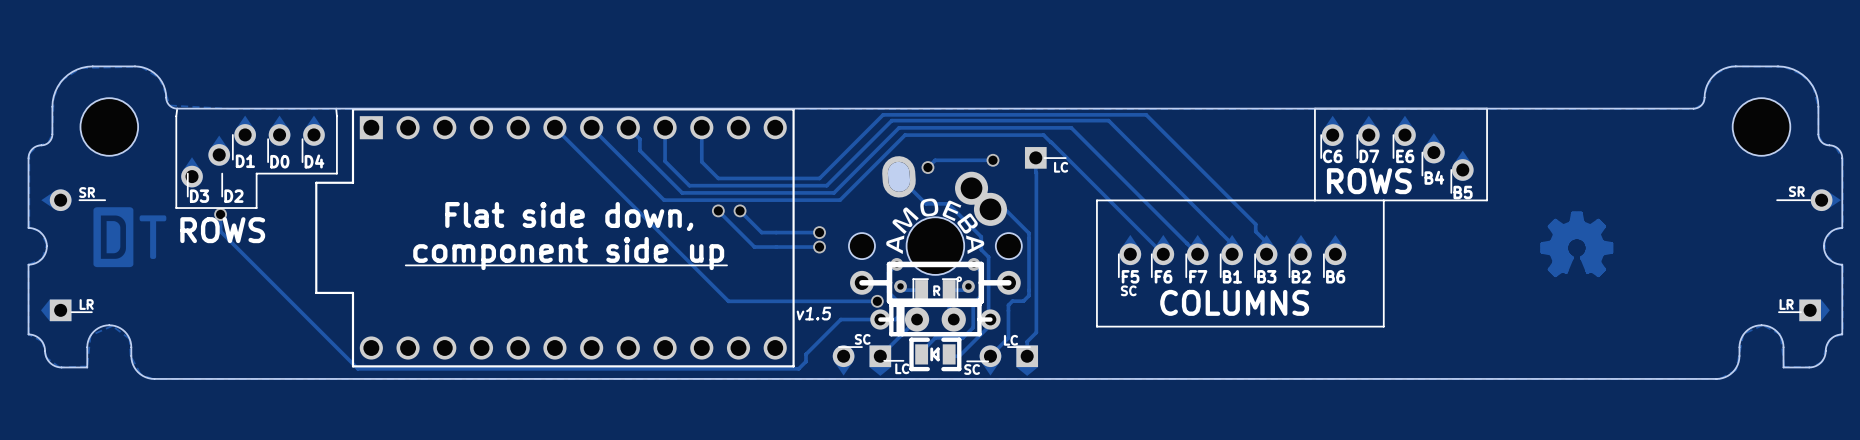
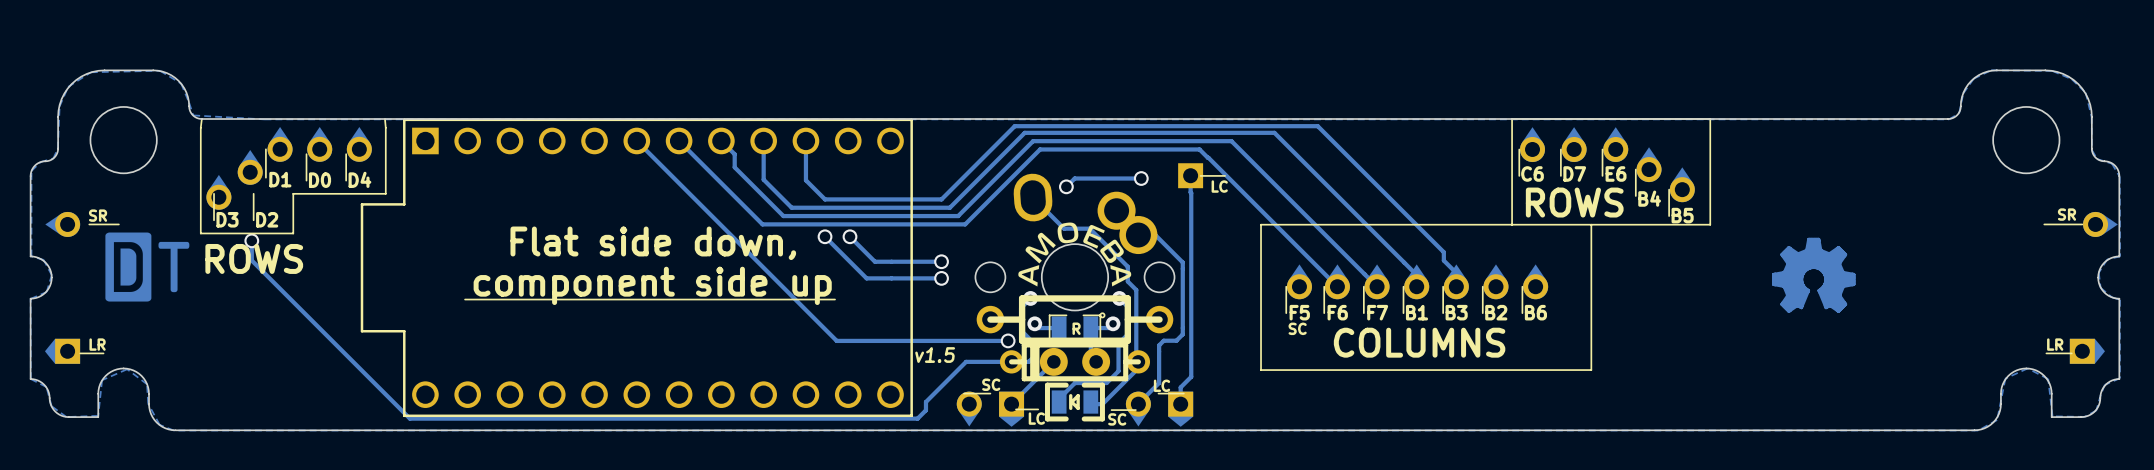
board edge: (898, 172) (899, 181) (898, 172) -> none

